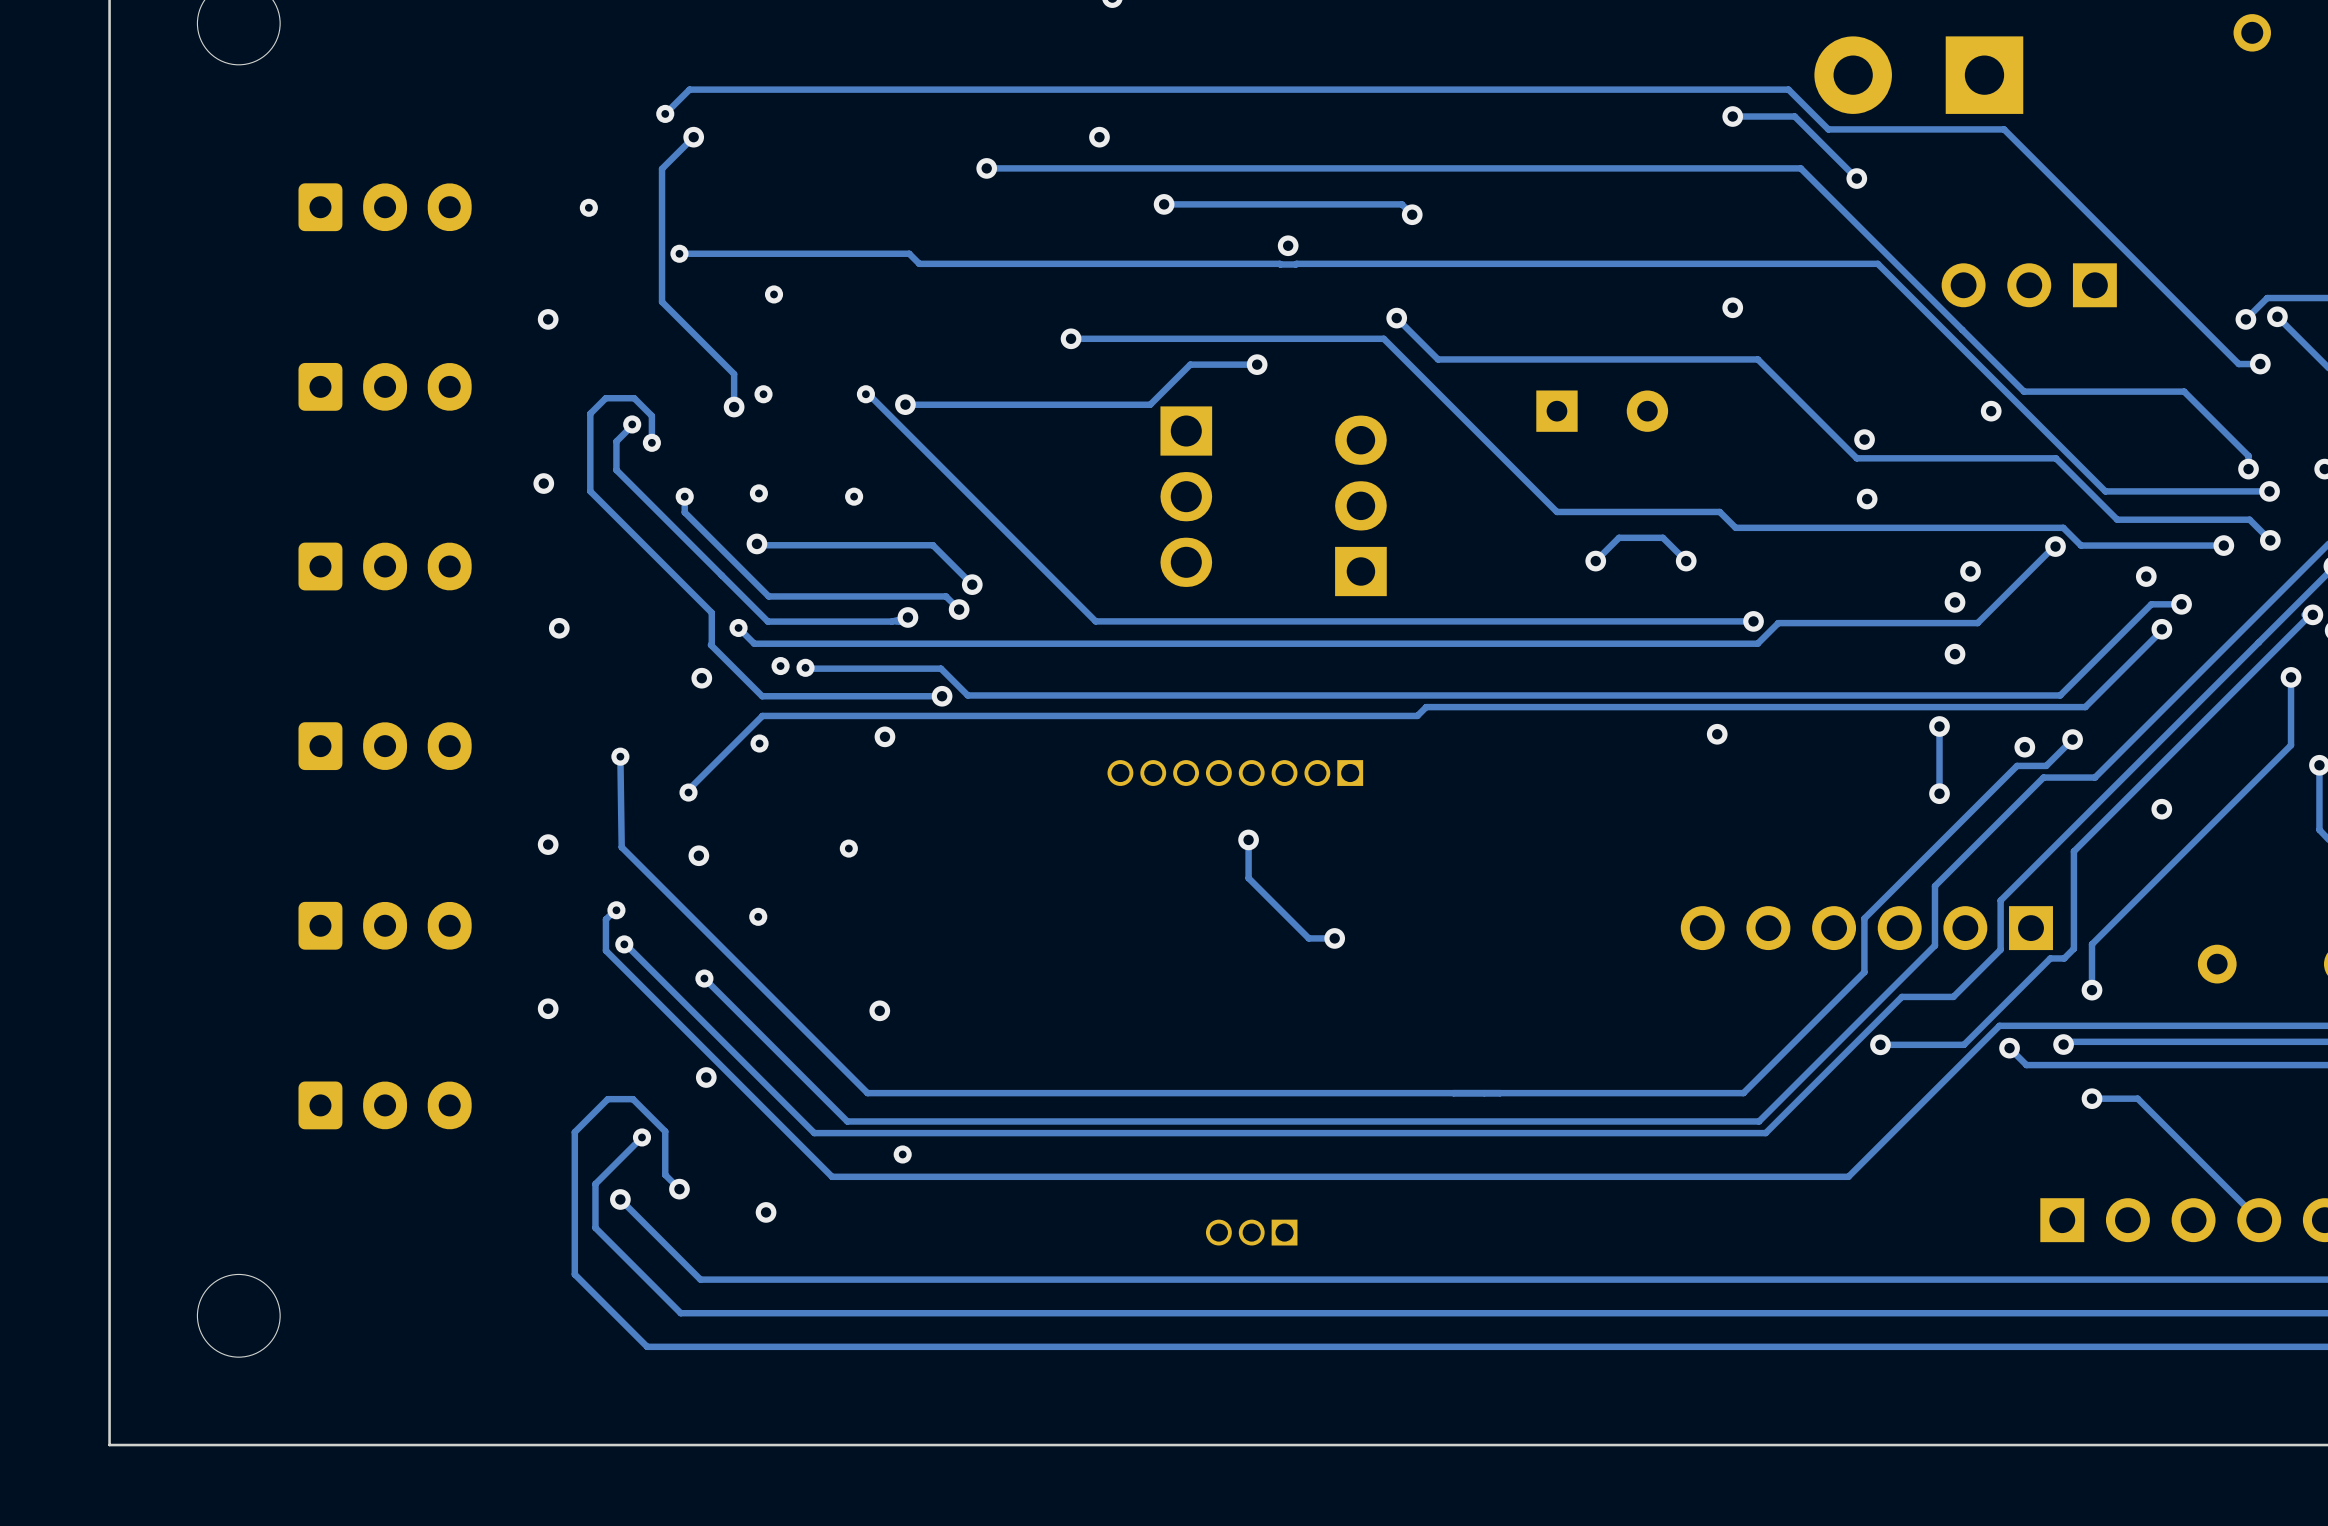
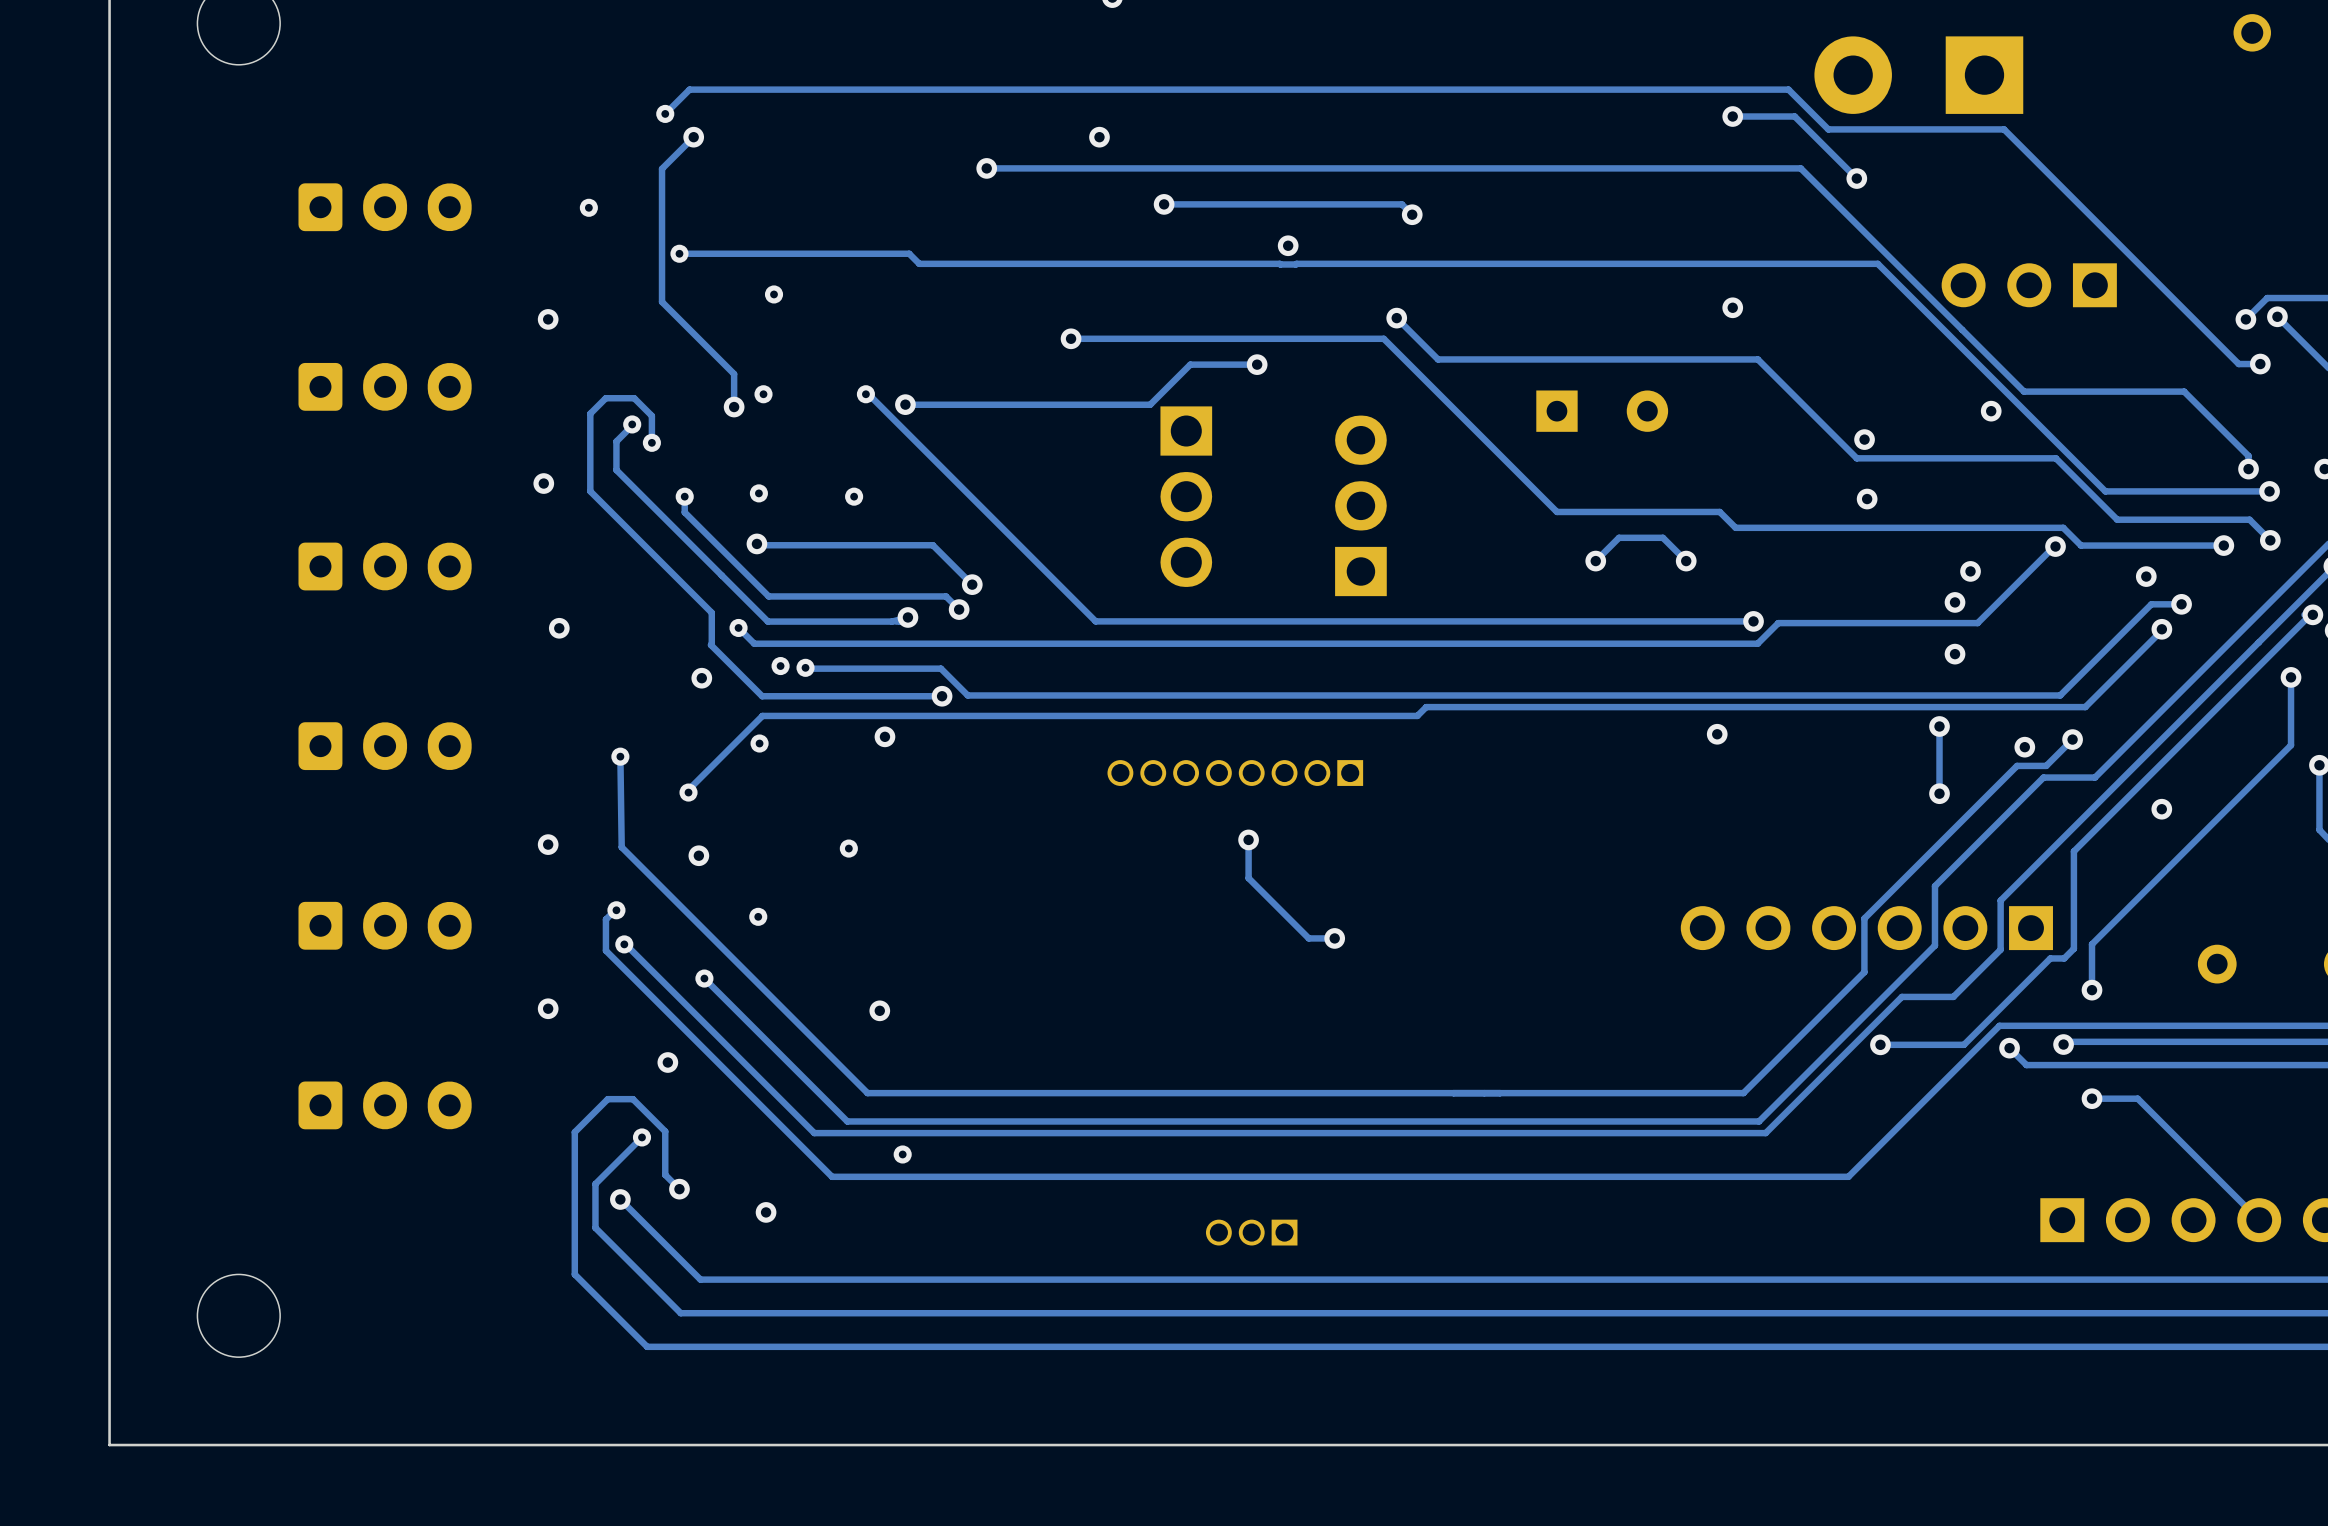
via position: (706, 1077) -> (667, 1062)

